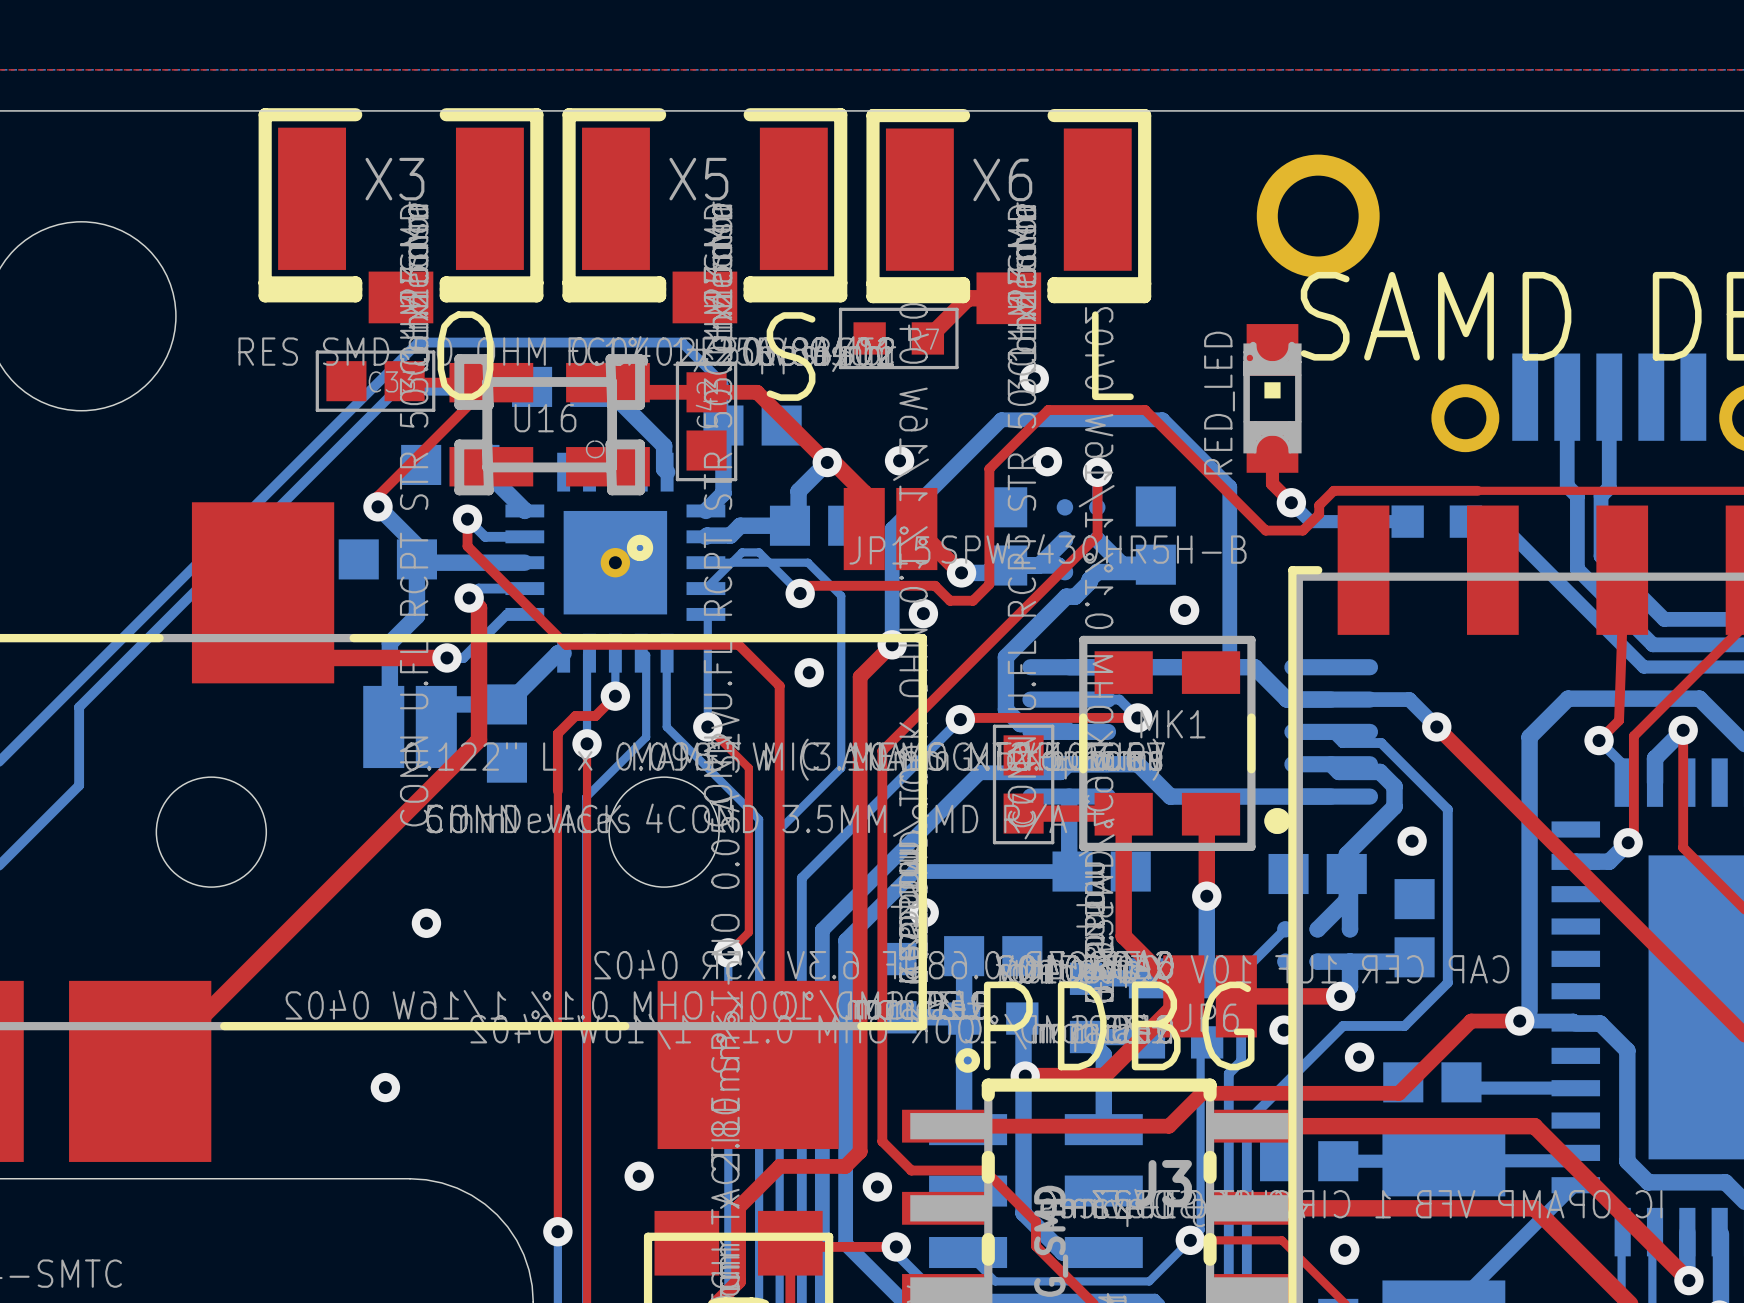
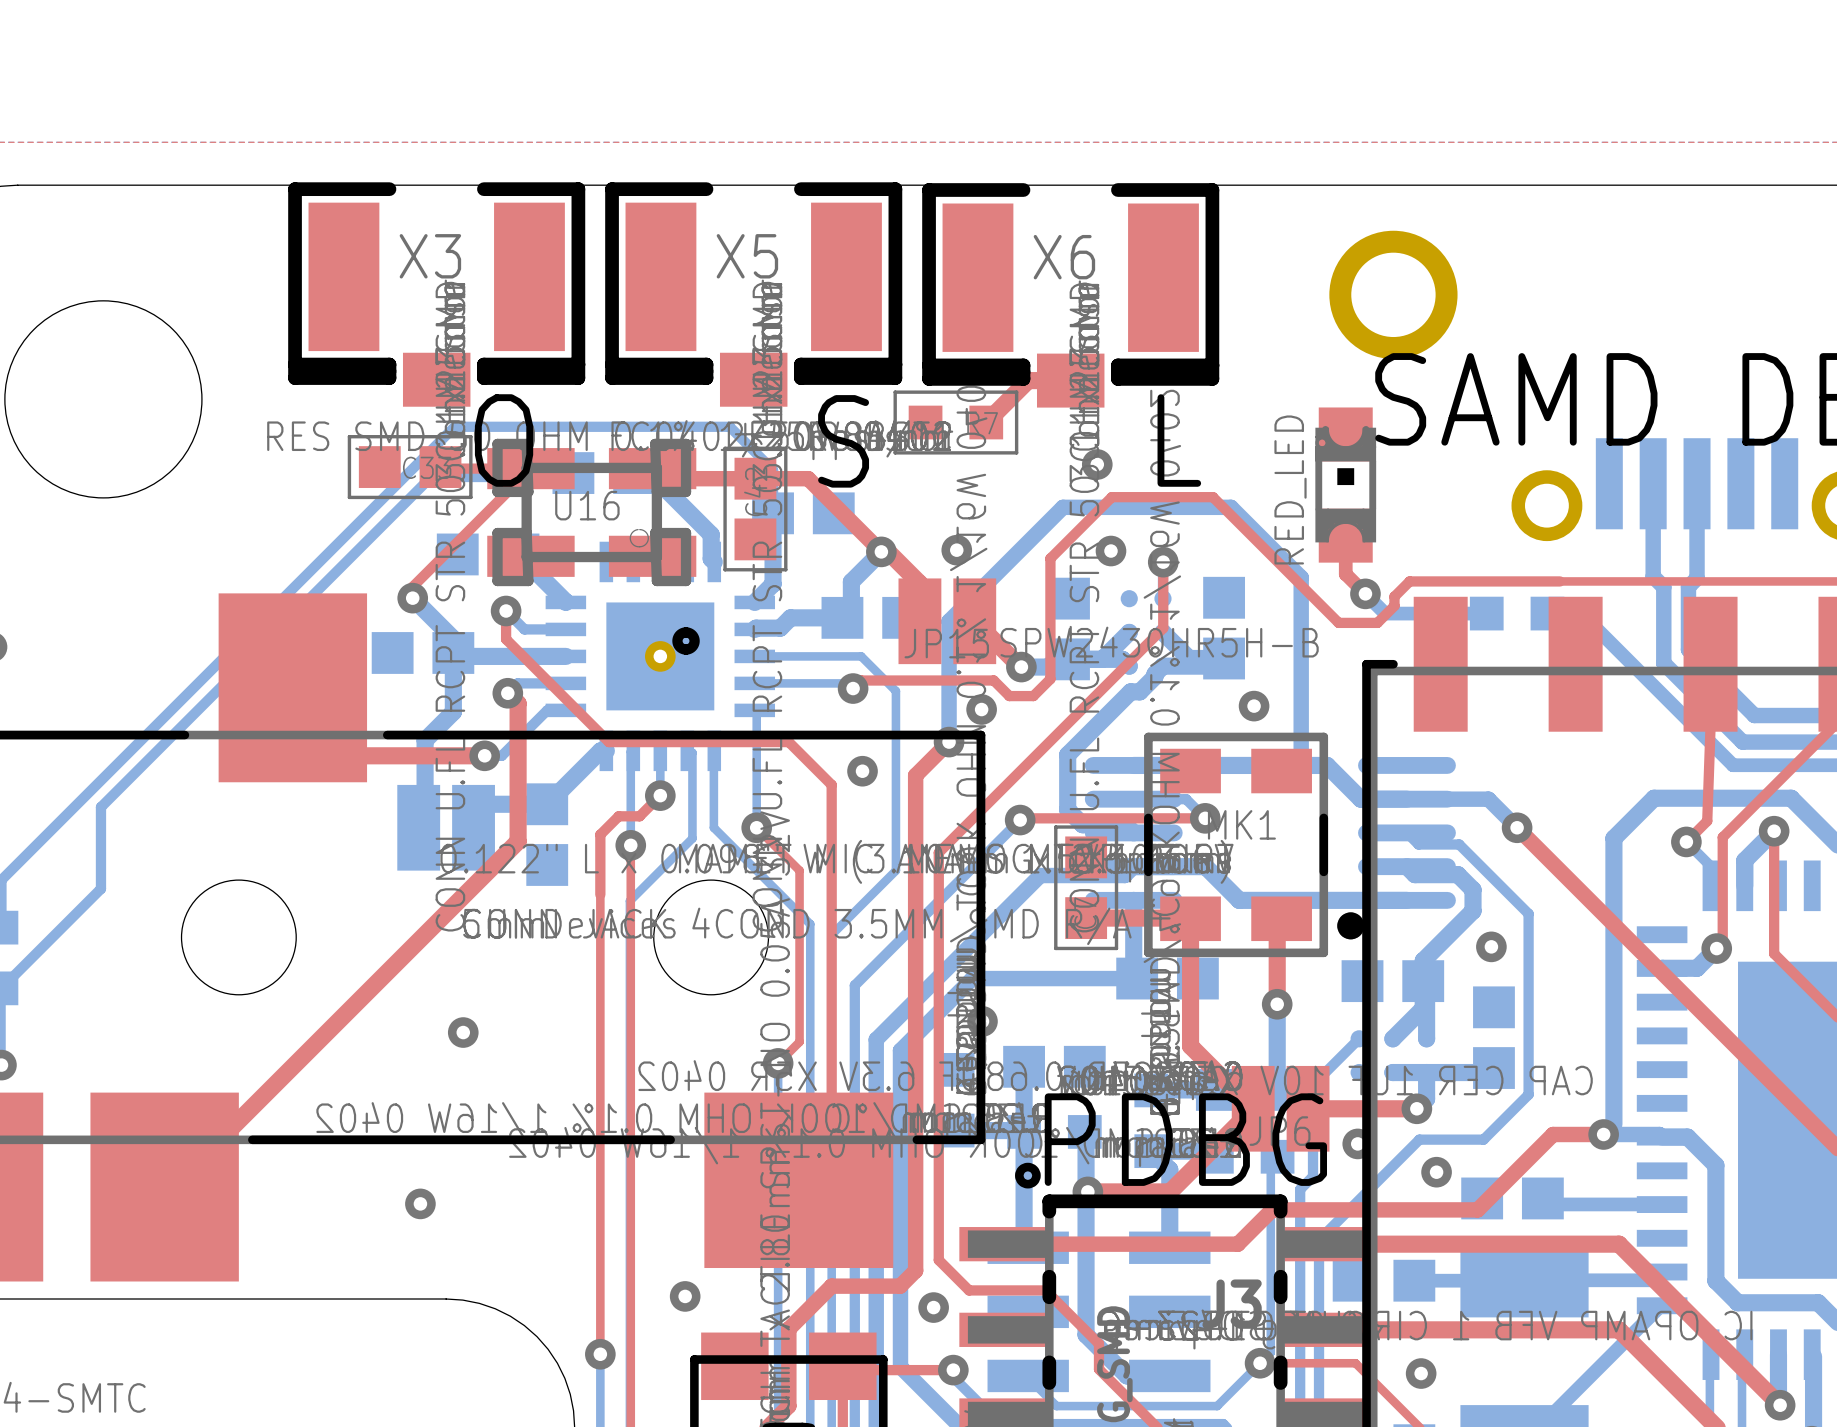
bottom track: (705, 588) (742, 552) (759, 552) (795, 588) -> (754, 683) (847, 683)

